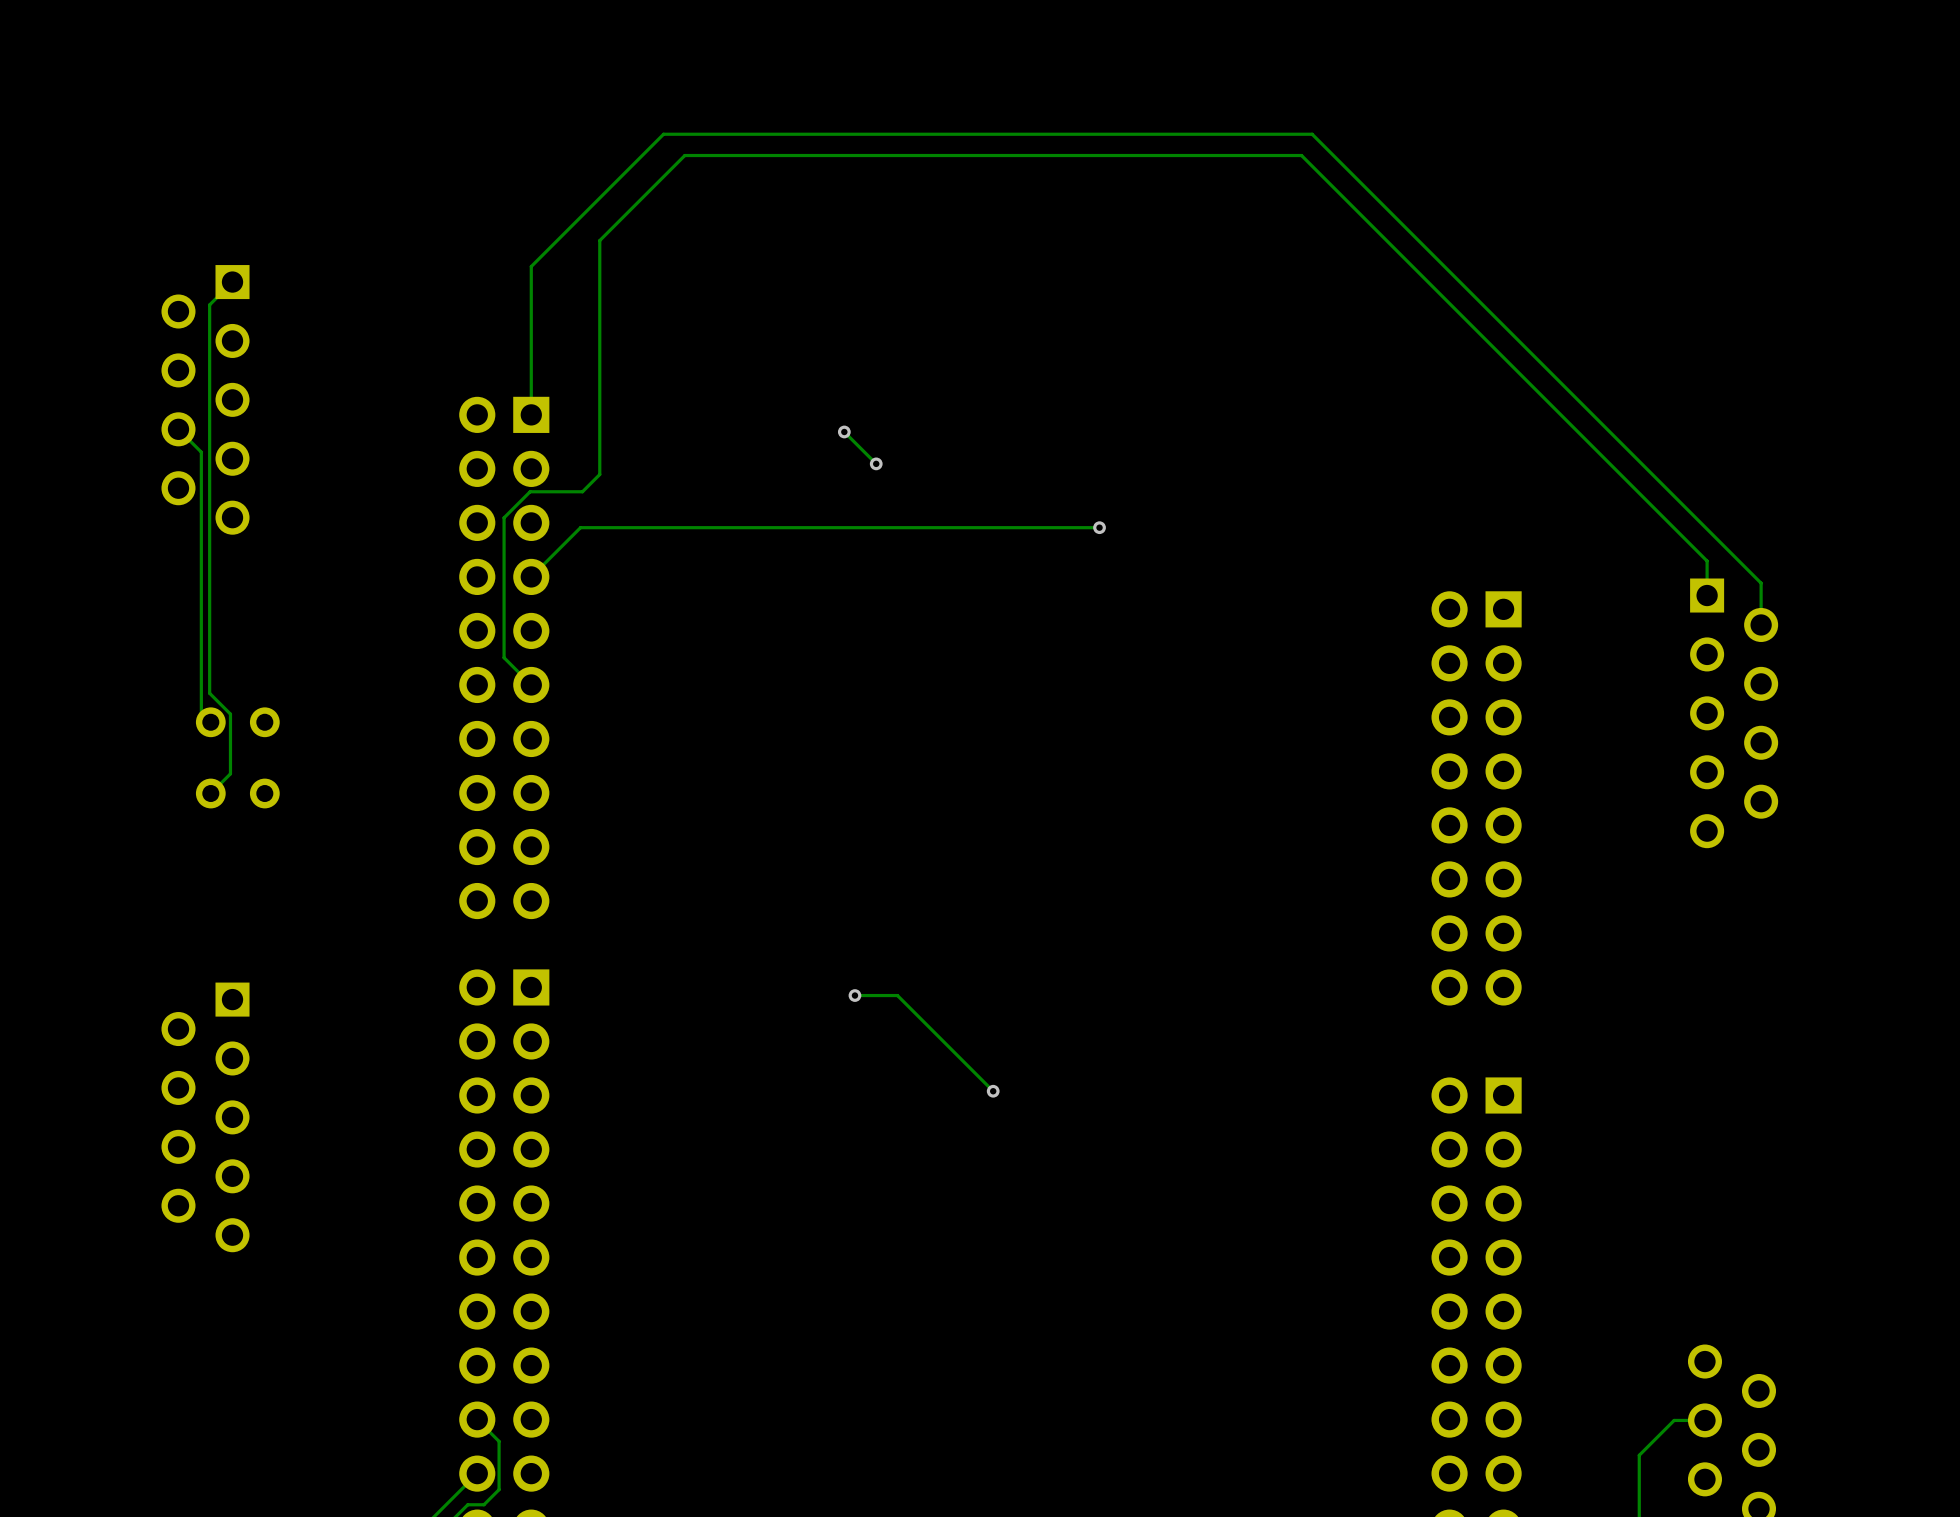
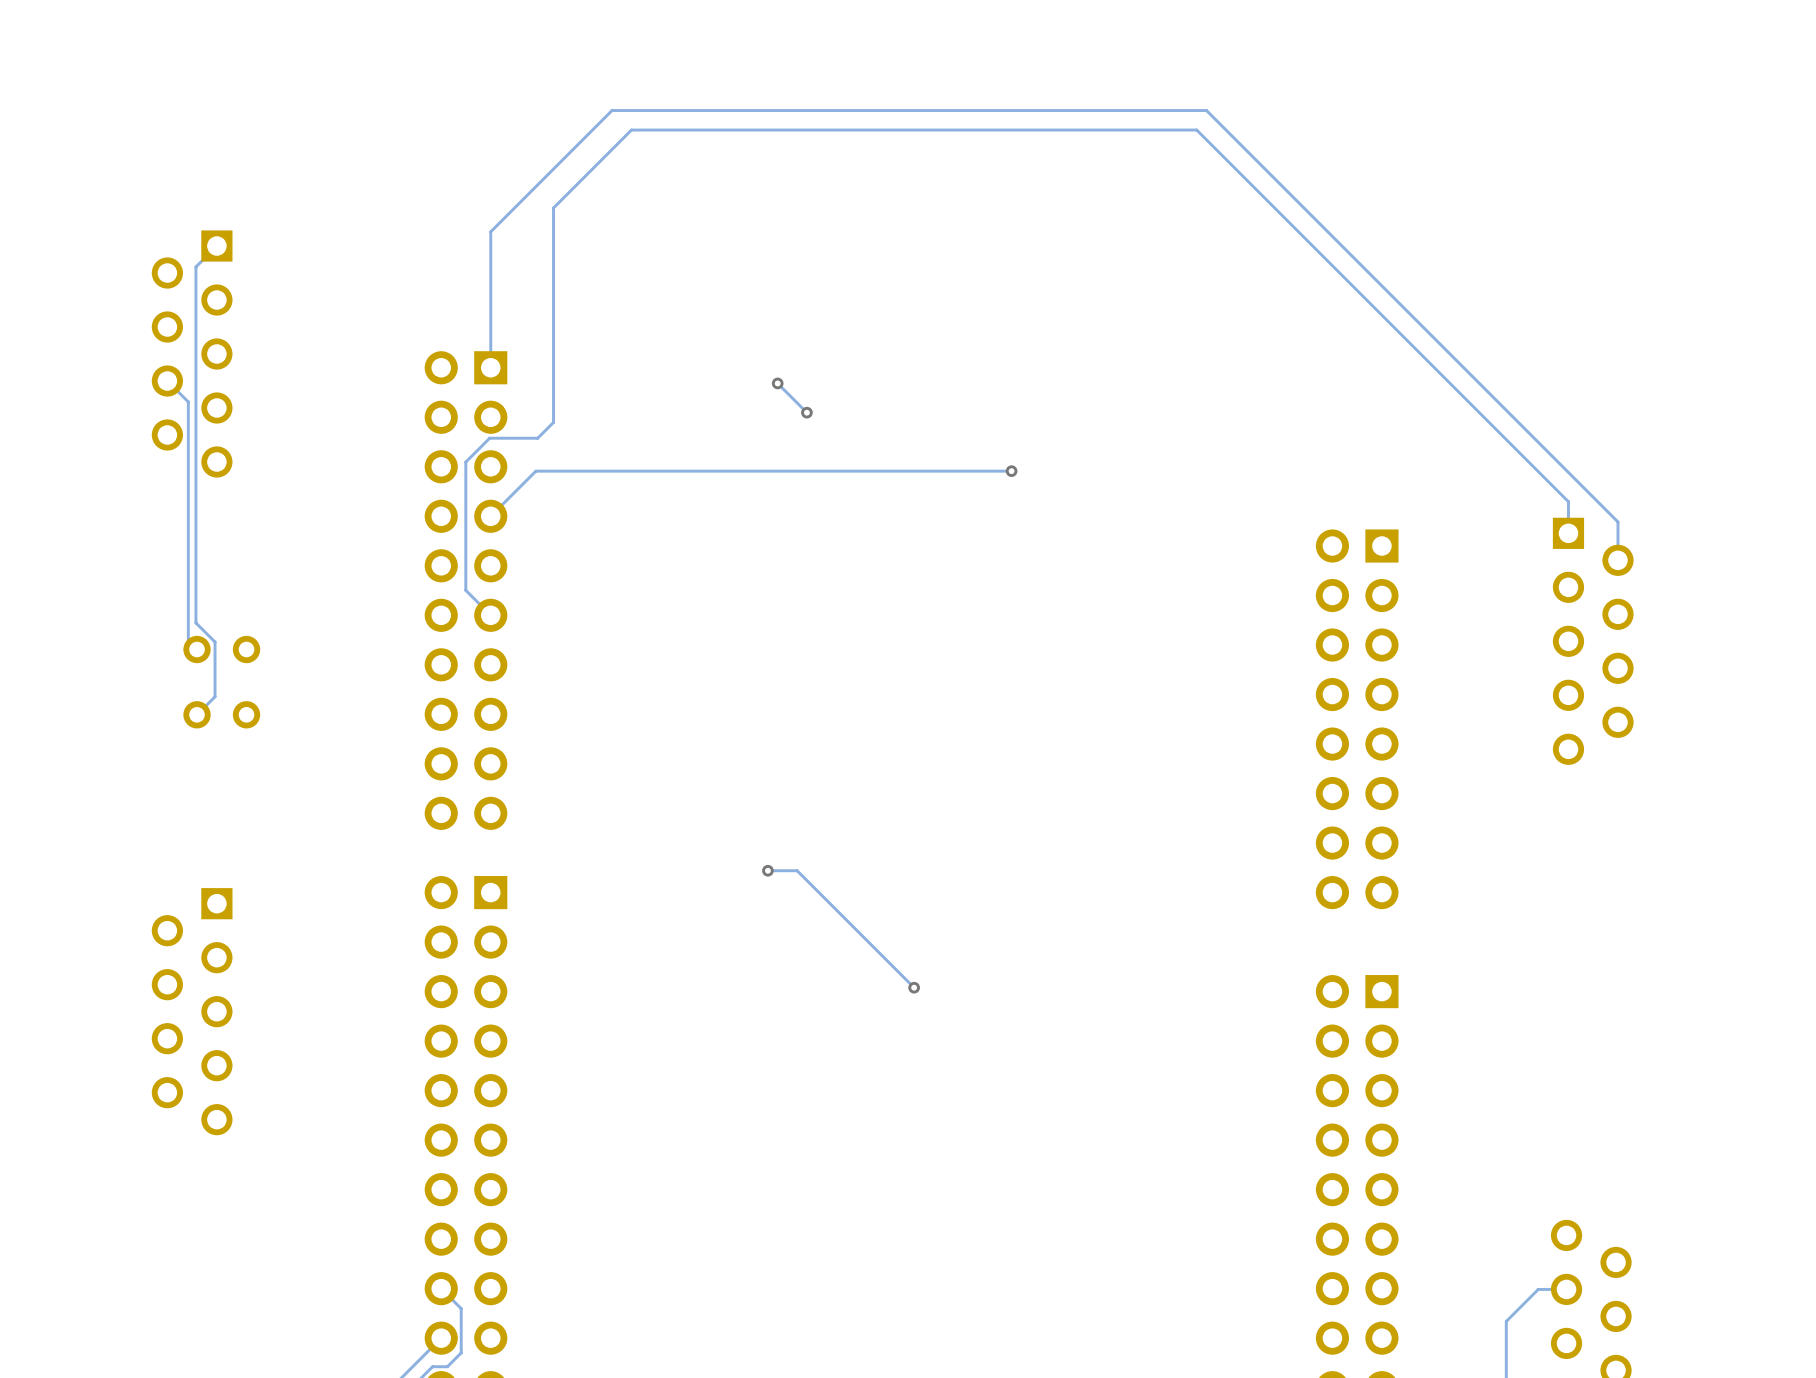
via position: (854, 995) -> (767, 870)
track: (897, 995) (854, 995) -> (826, 899) (797, 870) (767, 870)

